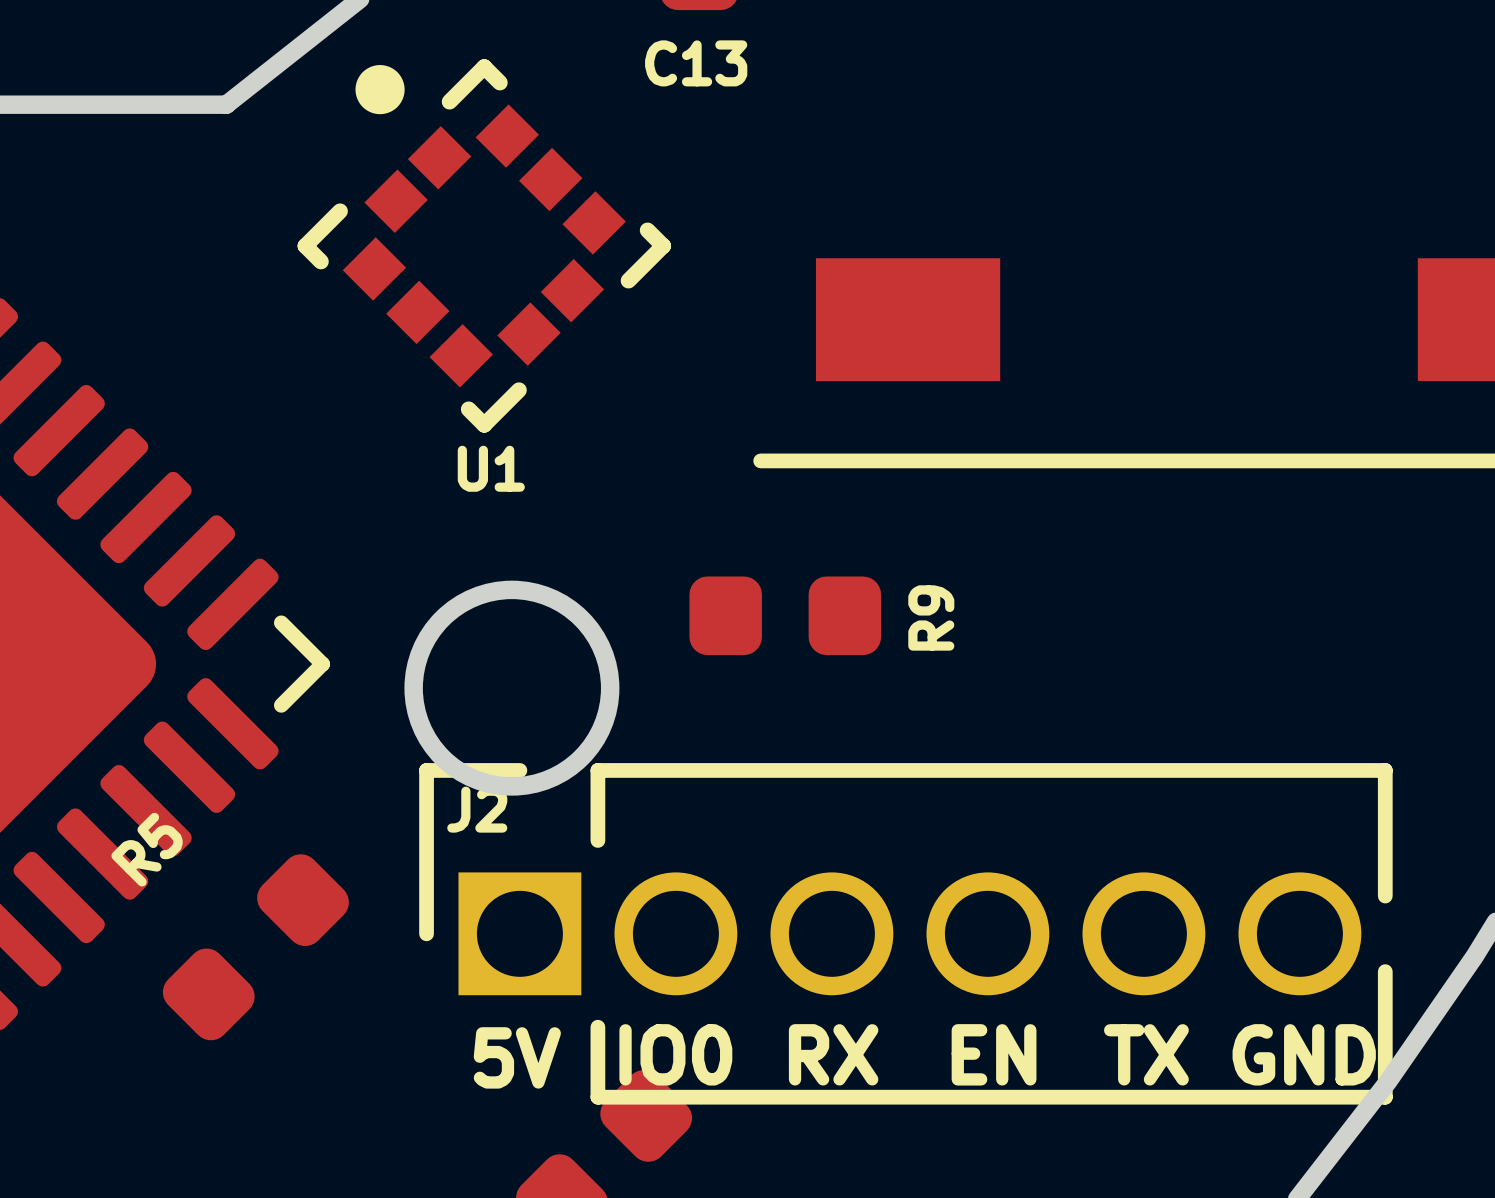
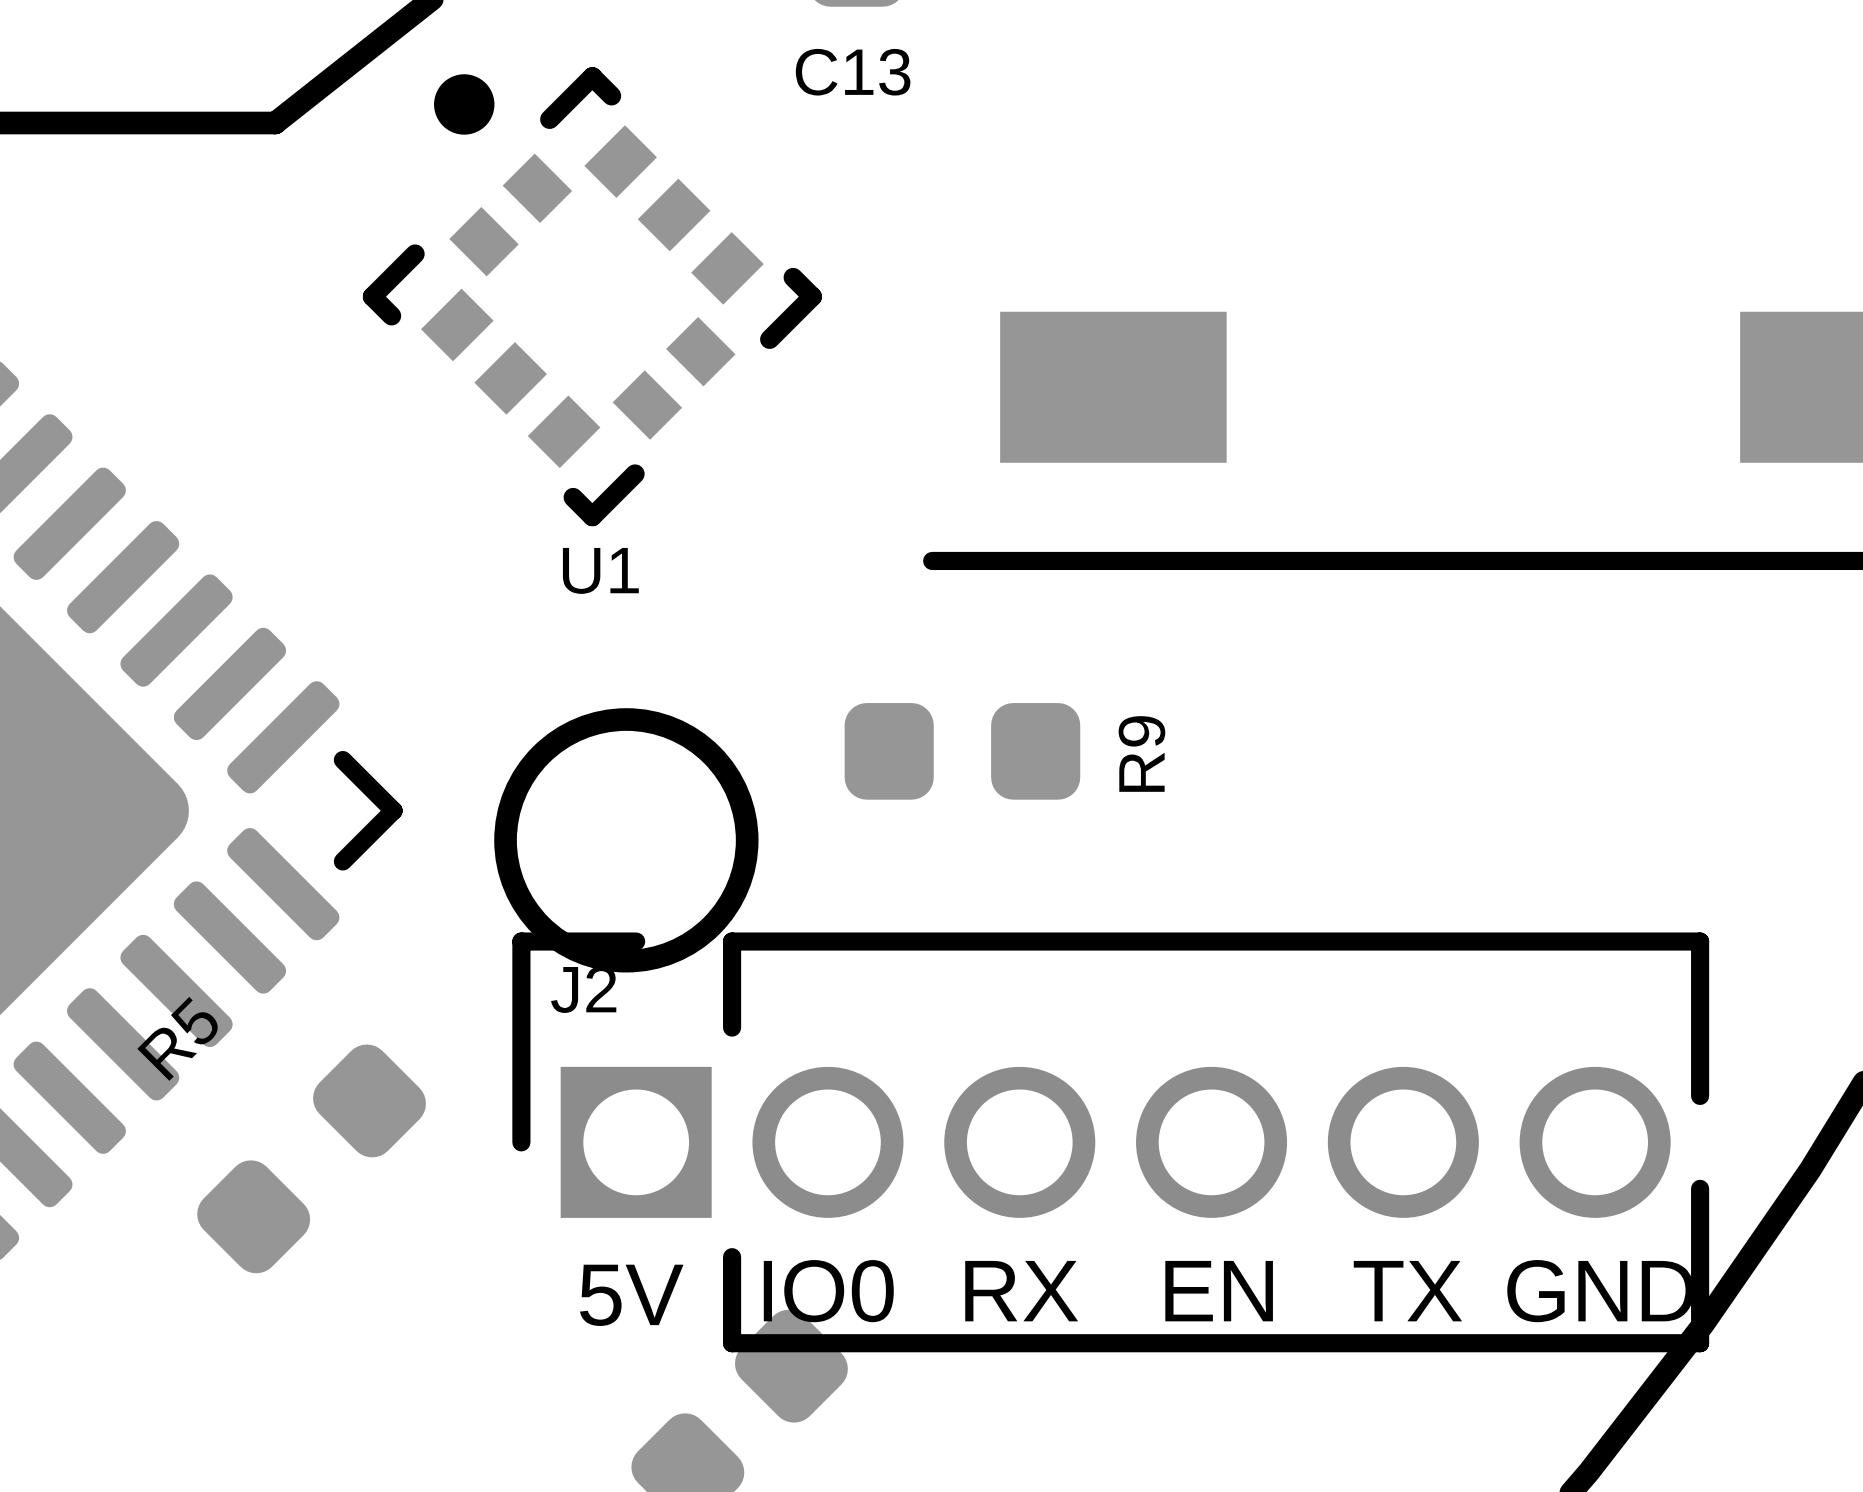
U1 footprint: [297, 59, 672, 433] -> [362, 67, 822, 527]

